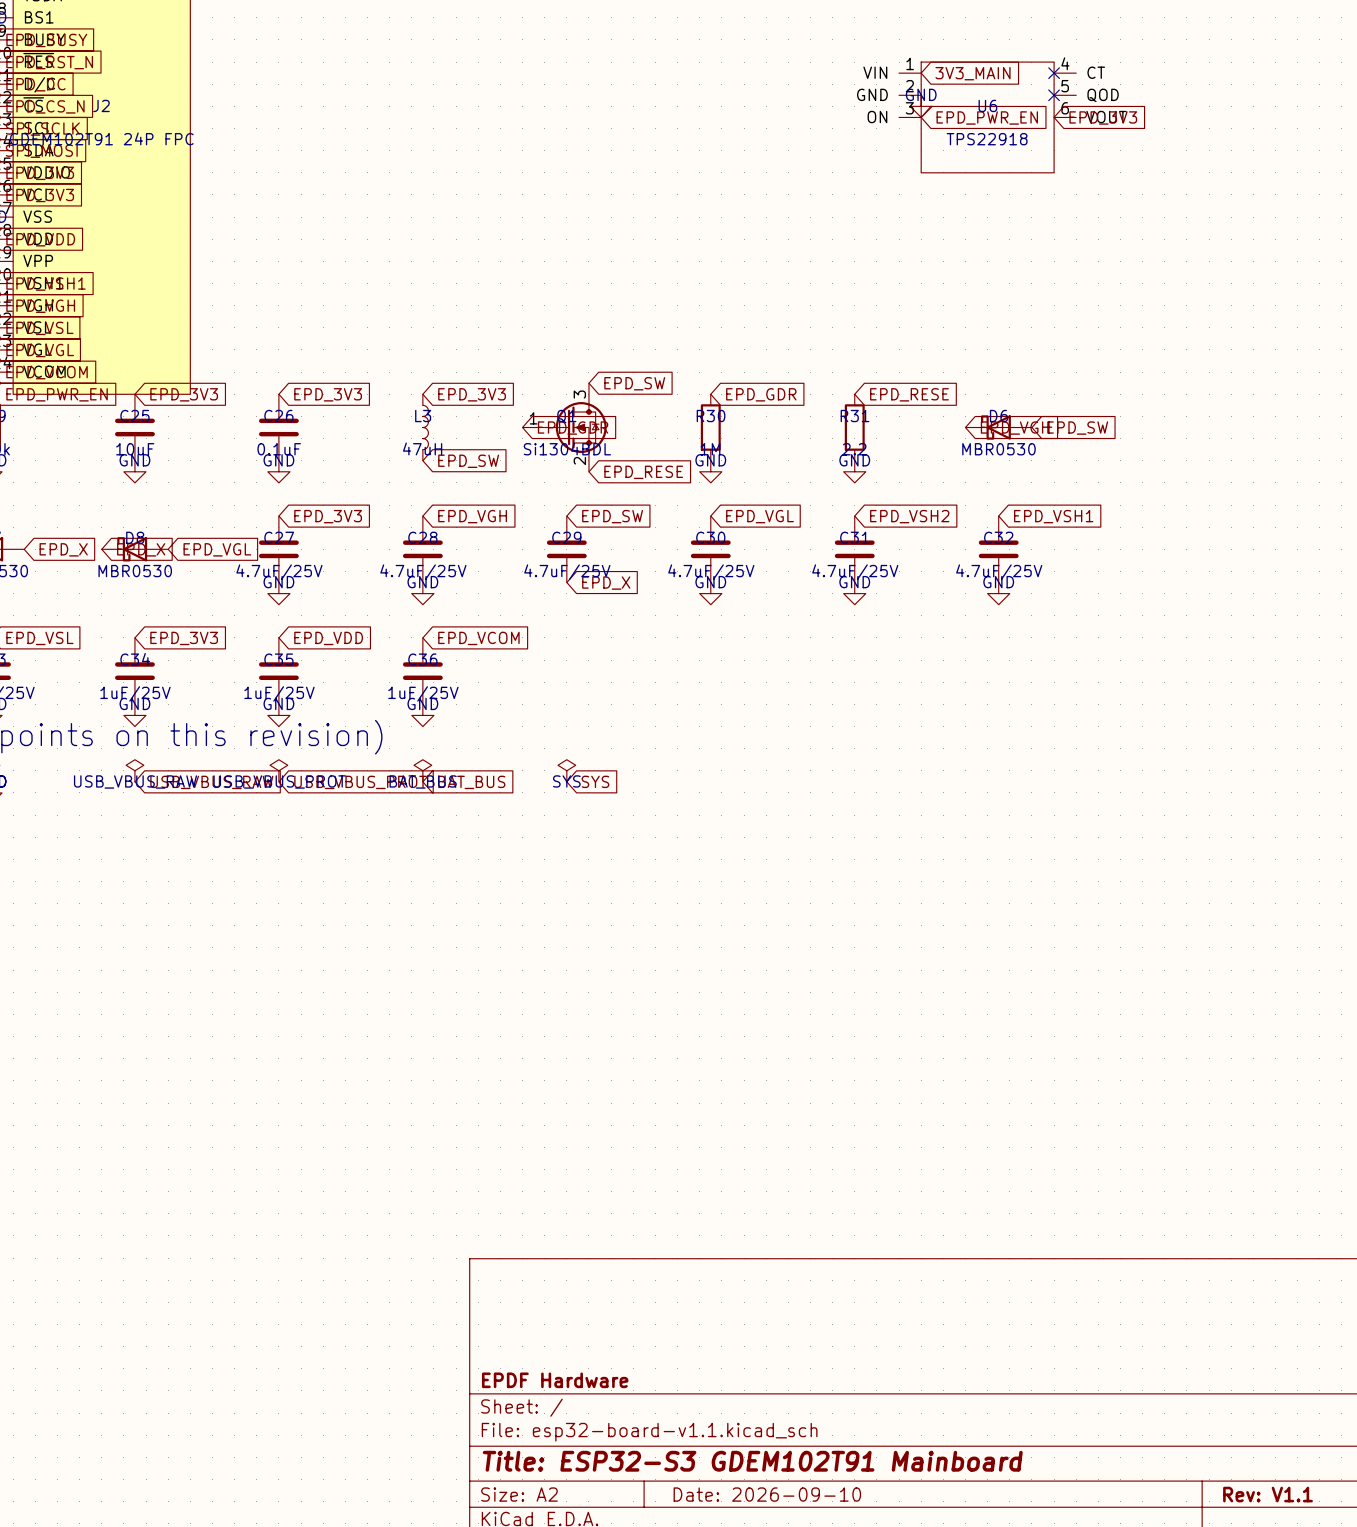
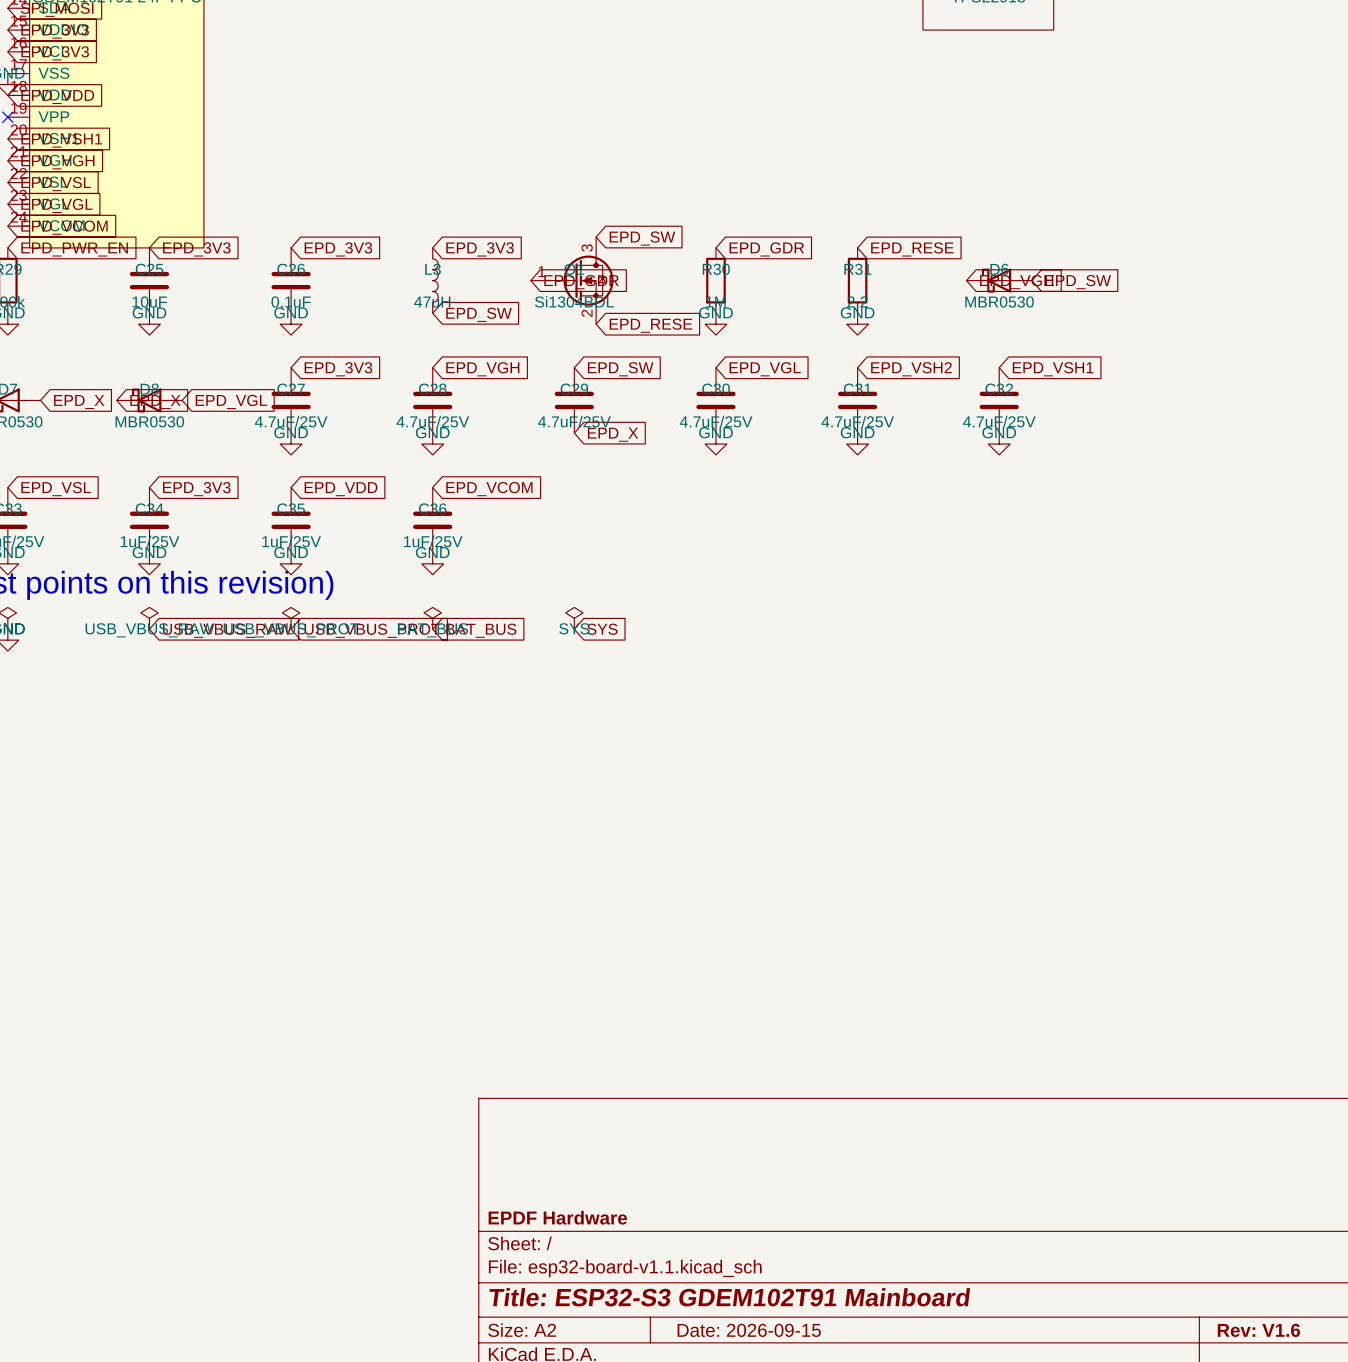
title block: Date: 2026-09-10 (767, 1494) -> Date: 2026-09-15 (749, 1330)
title block: Rev: V1.1 (1268, 1494) -> Rev: V1.6 (1258, 1330)

